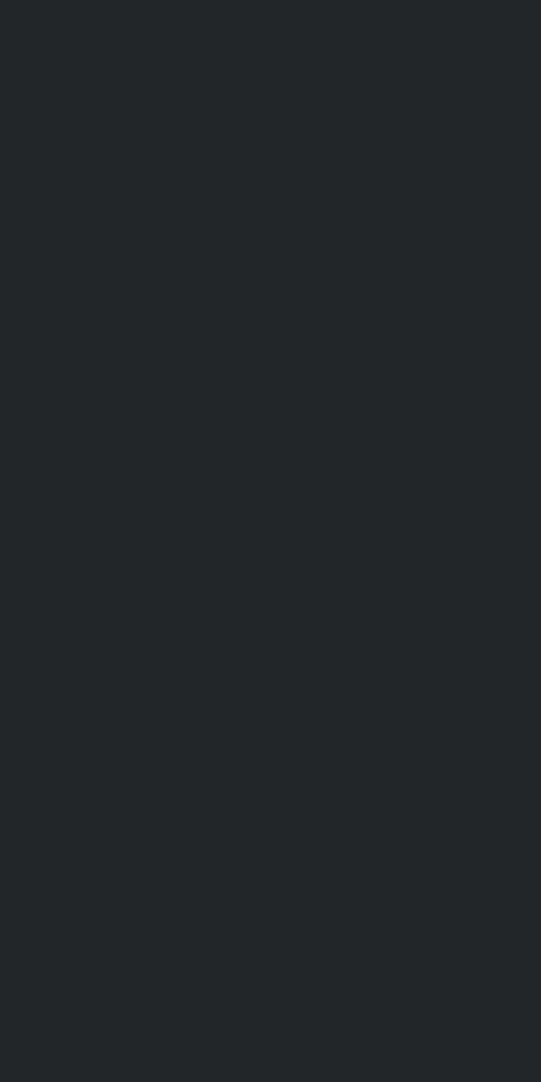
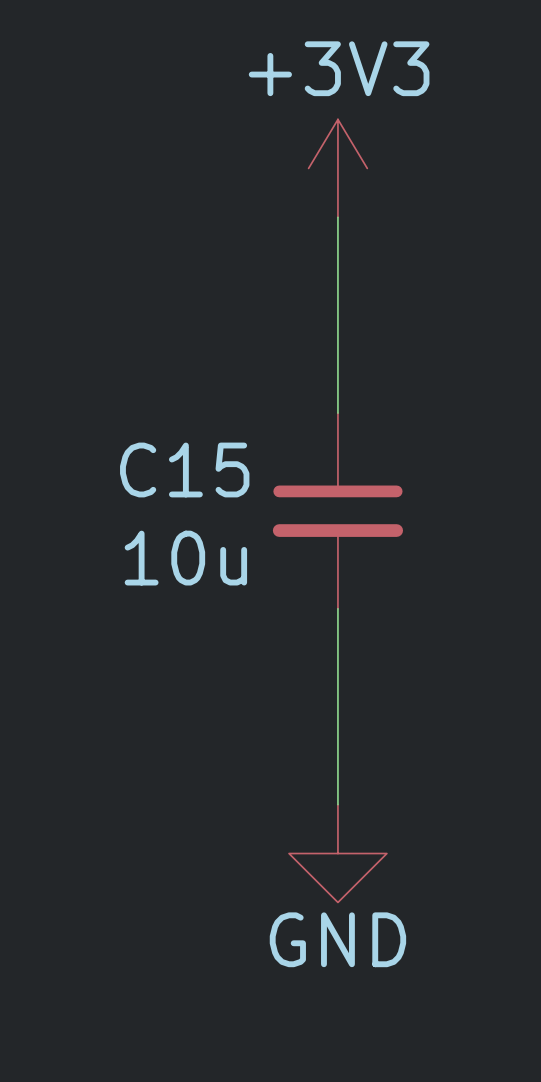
power symbol: none -> +3V3 (337, 168)
wire: none -> (337, 217) (337, 413)
C15: none -> 10u (337, 510)
wire: none -> (337, 608) (337, 804)
power symbol: none -> GND (337, 853)

